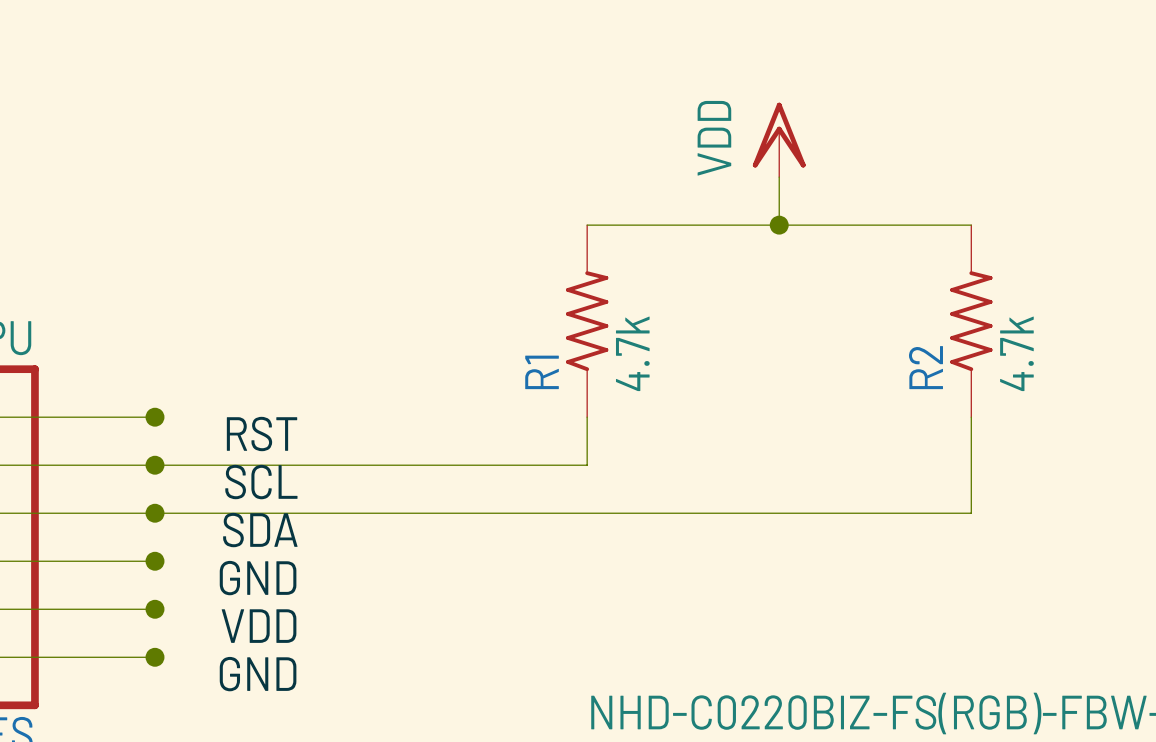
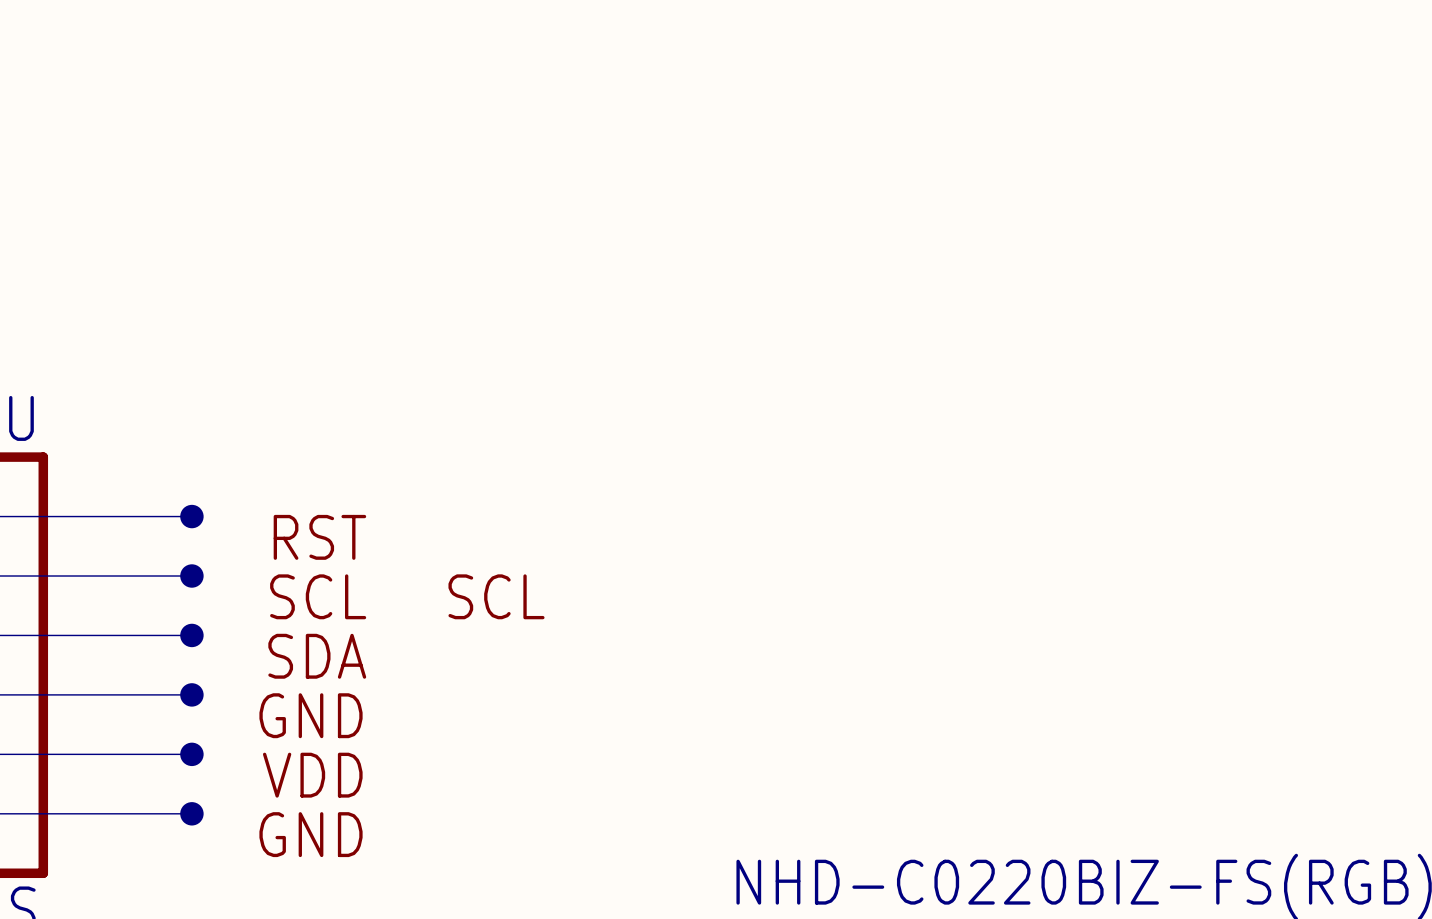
power symbol: VDD (779, 139) -> none
wire: (779, 177) (779, 225) -> none
wire: (587, 225) (971, 225) -> none
junction: (779, 225) -> none
R1: 4.7k (587, 321) -> none
R2: 4.7k (971, 321) -> none
wire: (587, 417) (587, 465) (155, 465) -> none
wire: (971, 417) (971, 513) (155, 513) -> none
label: none -> SCL (496, 596)

